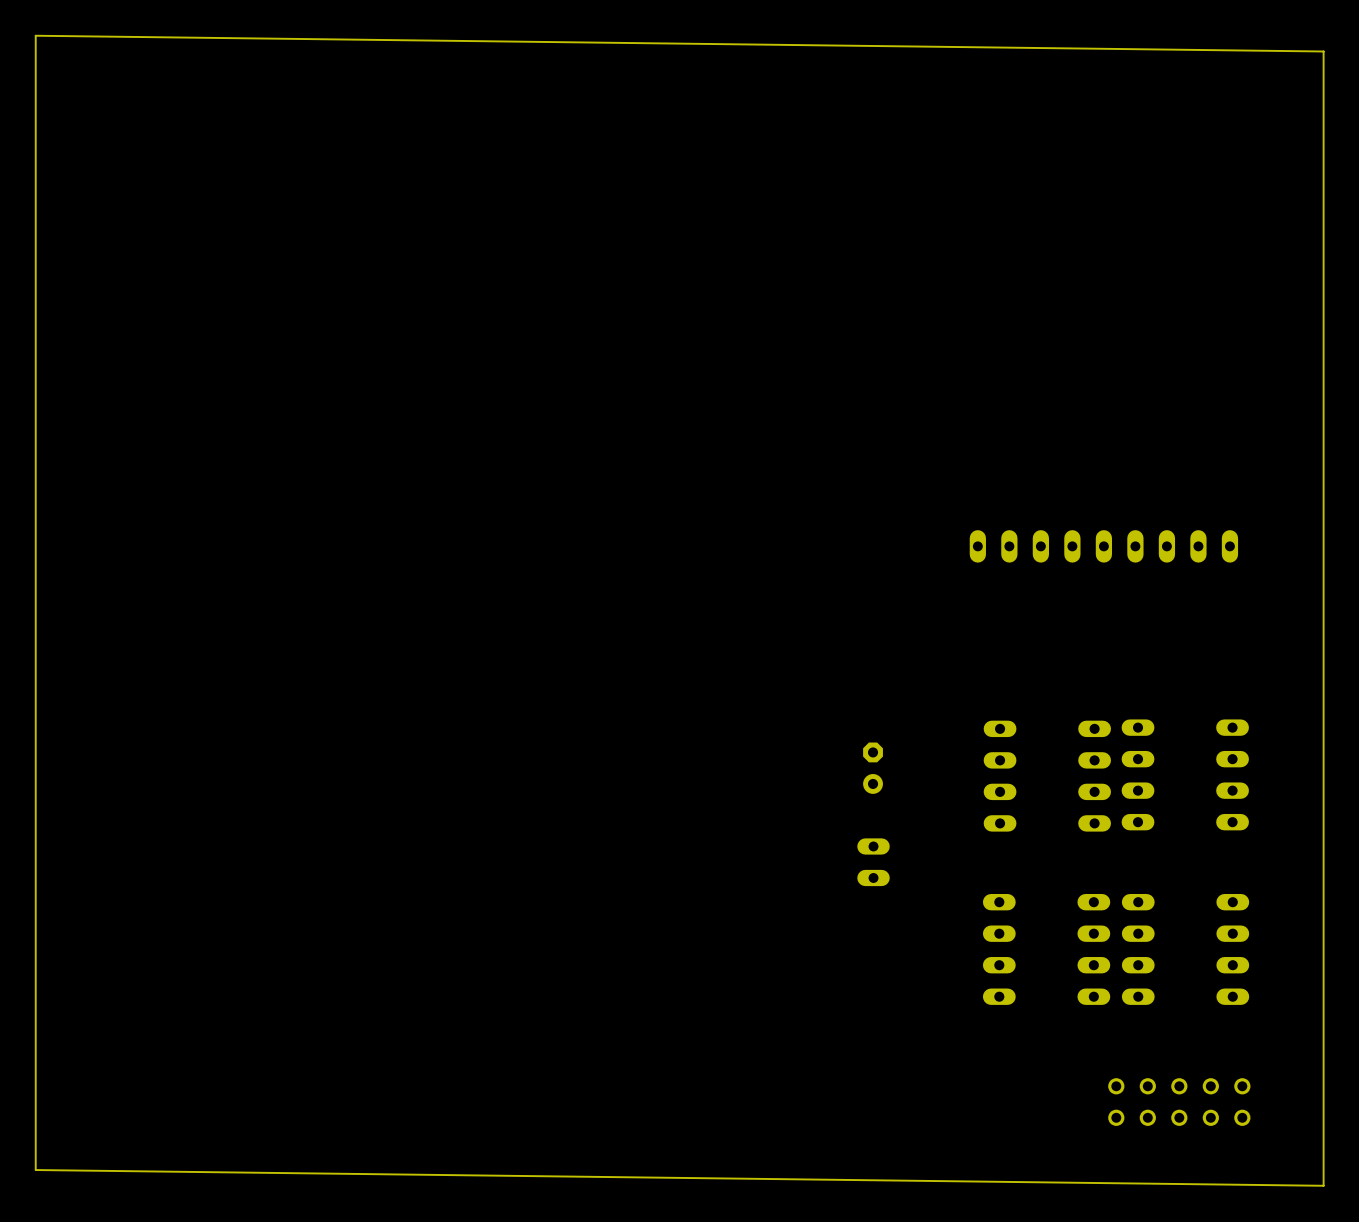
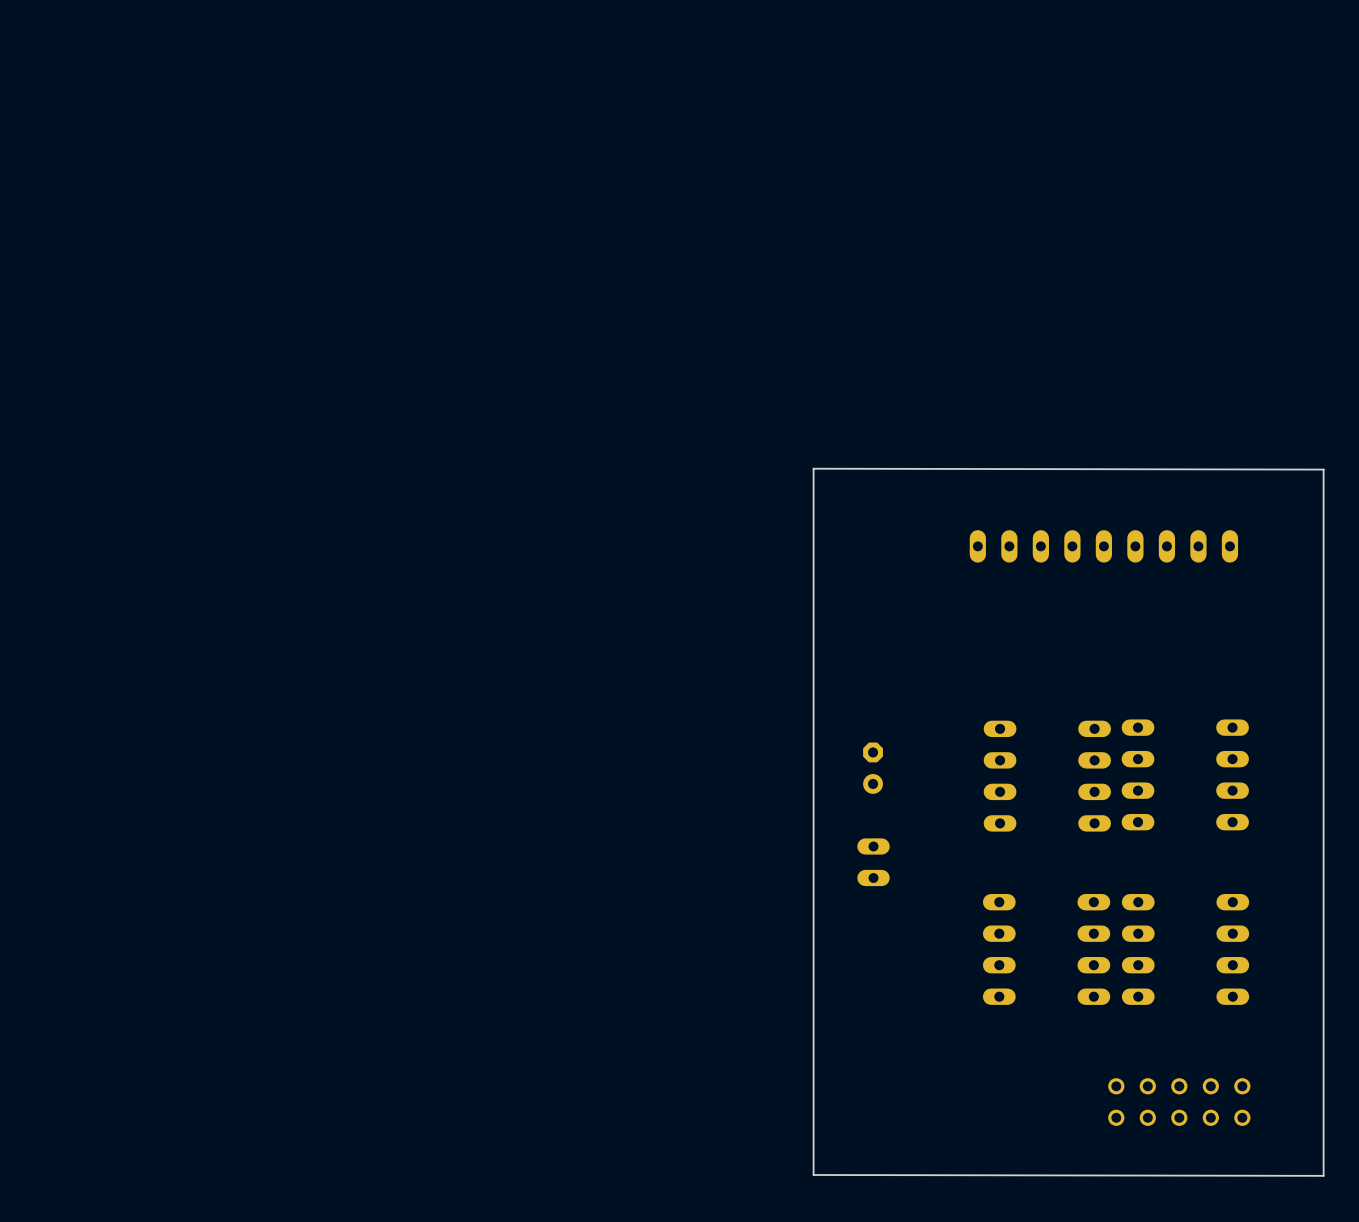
board edge: (1323, 469) (1323, 51) (35, 35) (35, 1170) (1323, 1185) (1323, 1175) -> (1323, 469) (813, 468) (813, 1174) (1323, 1175)

